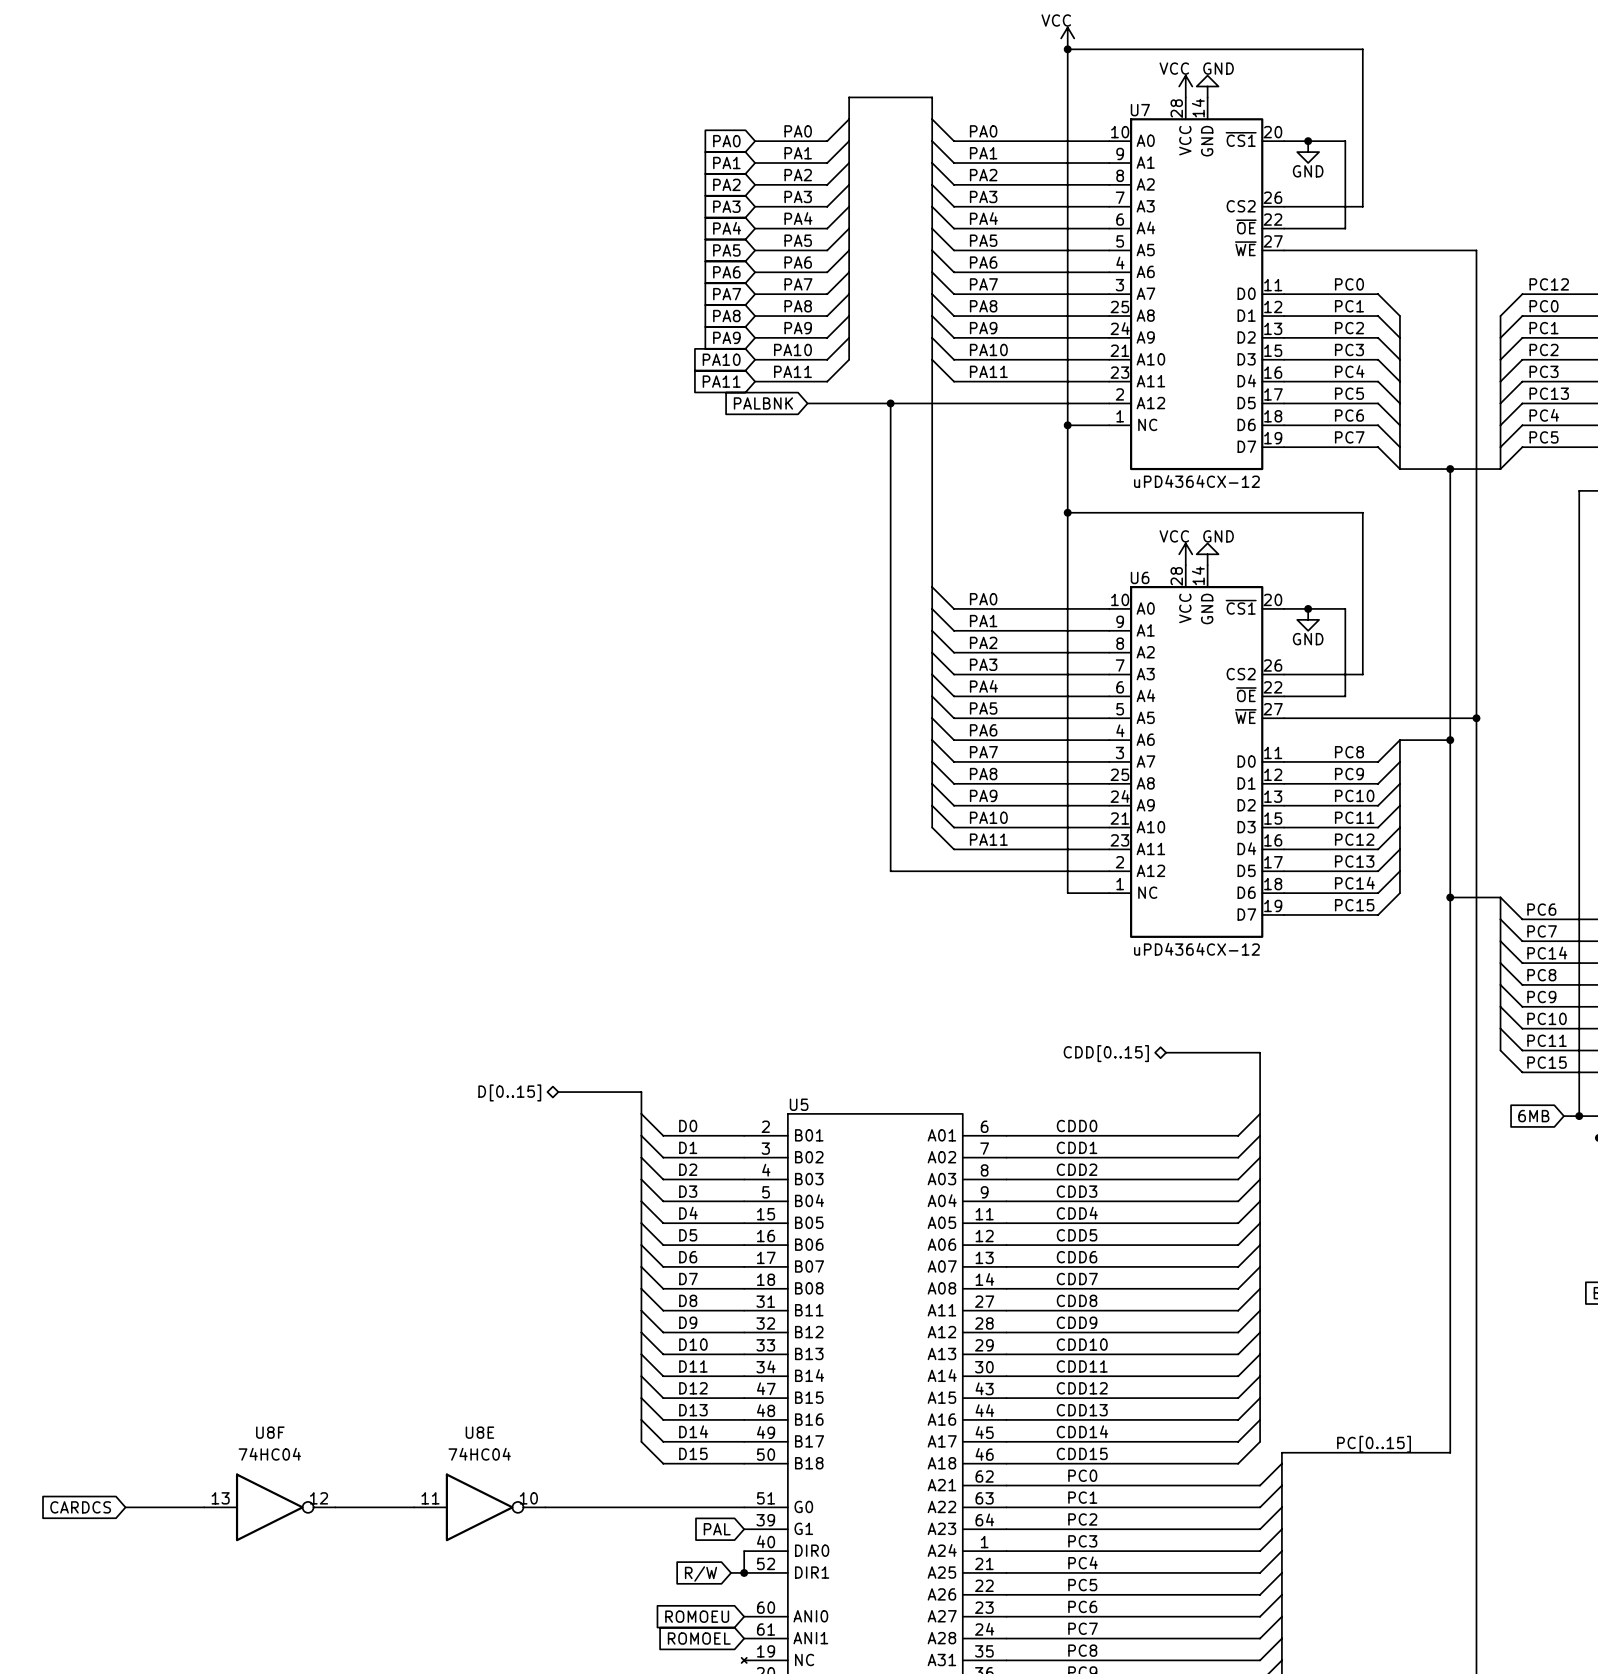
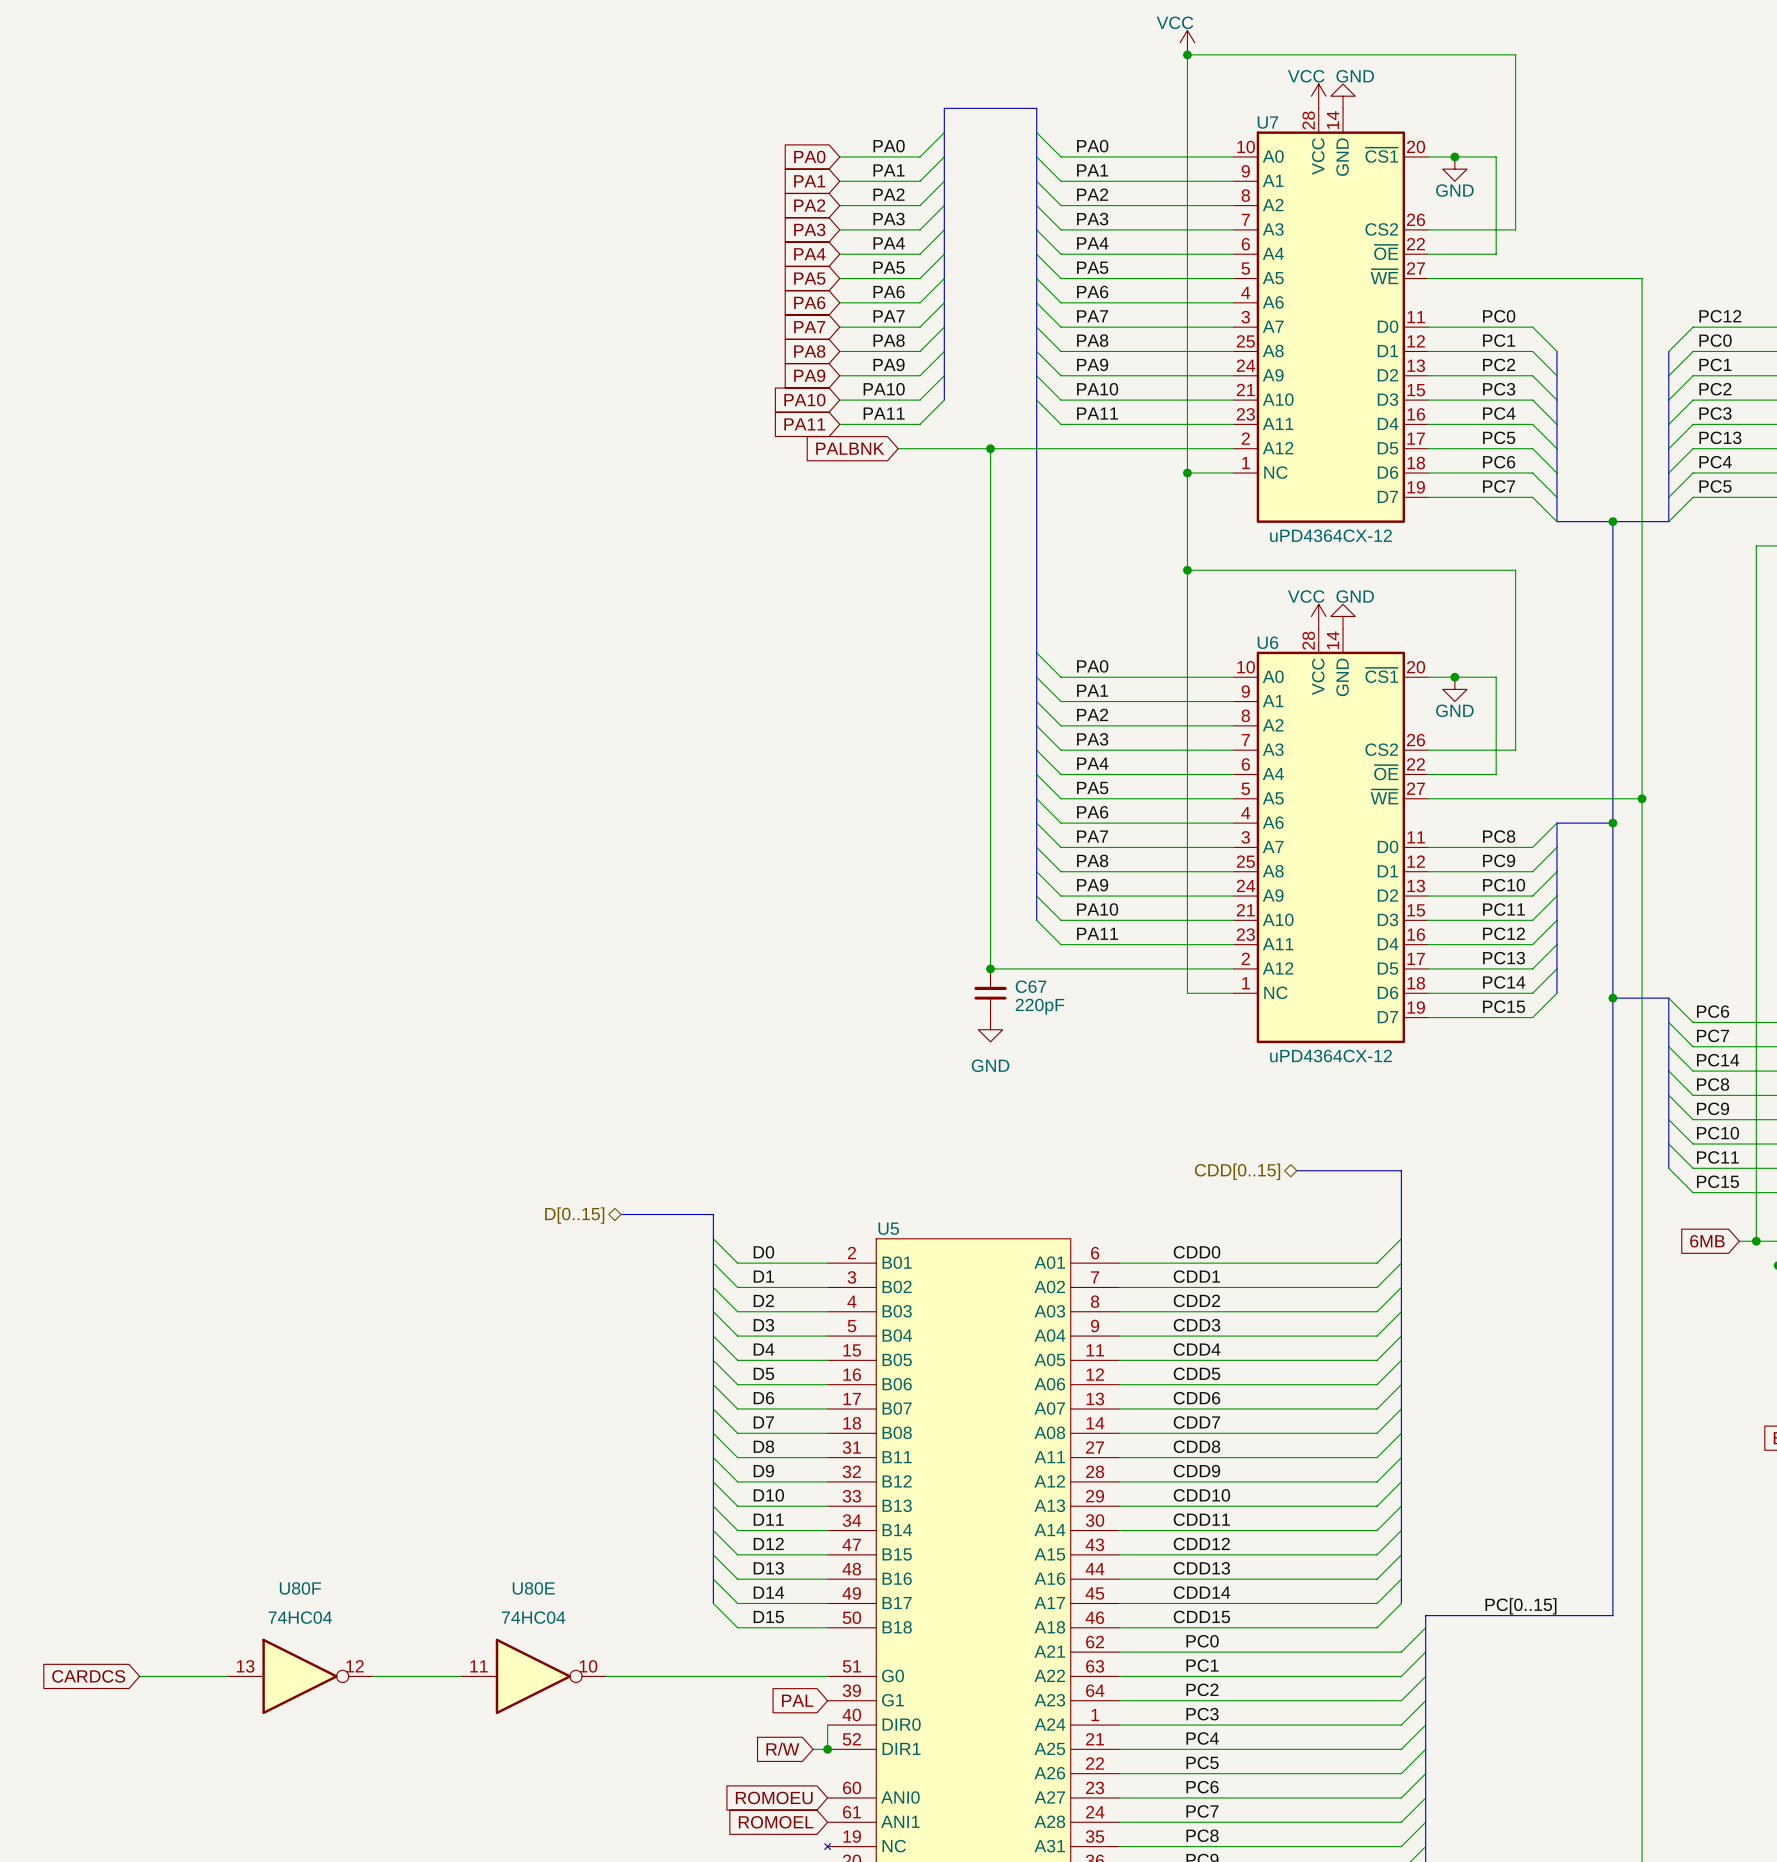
junction: none -> (990, 968)
C67: none -> 220pF (990, 993)
power symbol: none -> GND (990, 1029)
U8F name: U8F (270, 1432) -> U80F (300, 1588)
U8E name: U8E (479, 1432) -> U80E (533, 1588)

